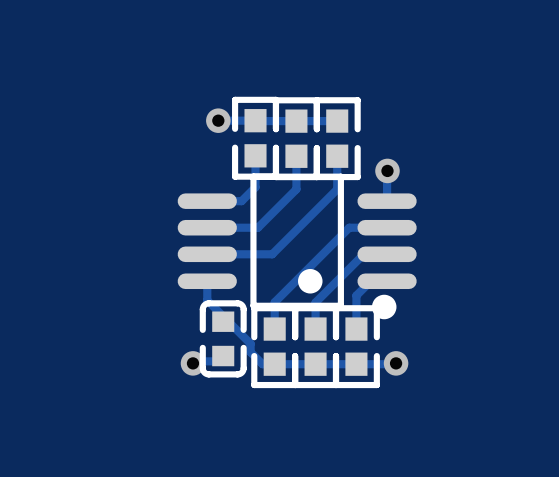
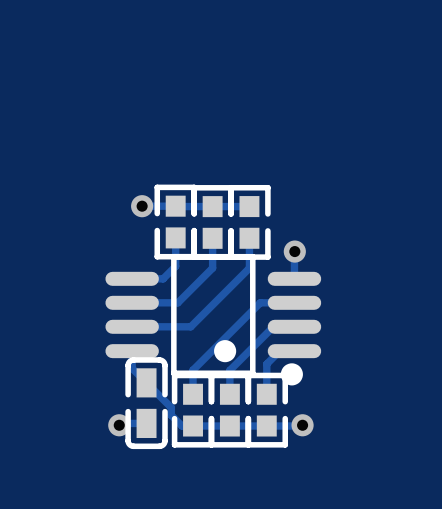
part footprint: [199, 300, 247, 378] -> [125, 357, 168, 450]

